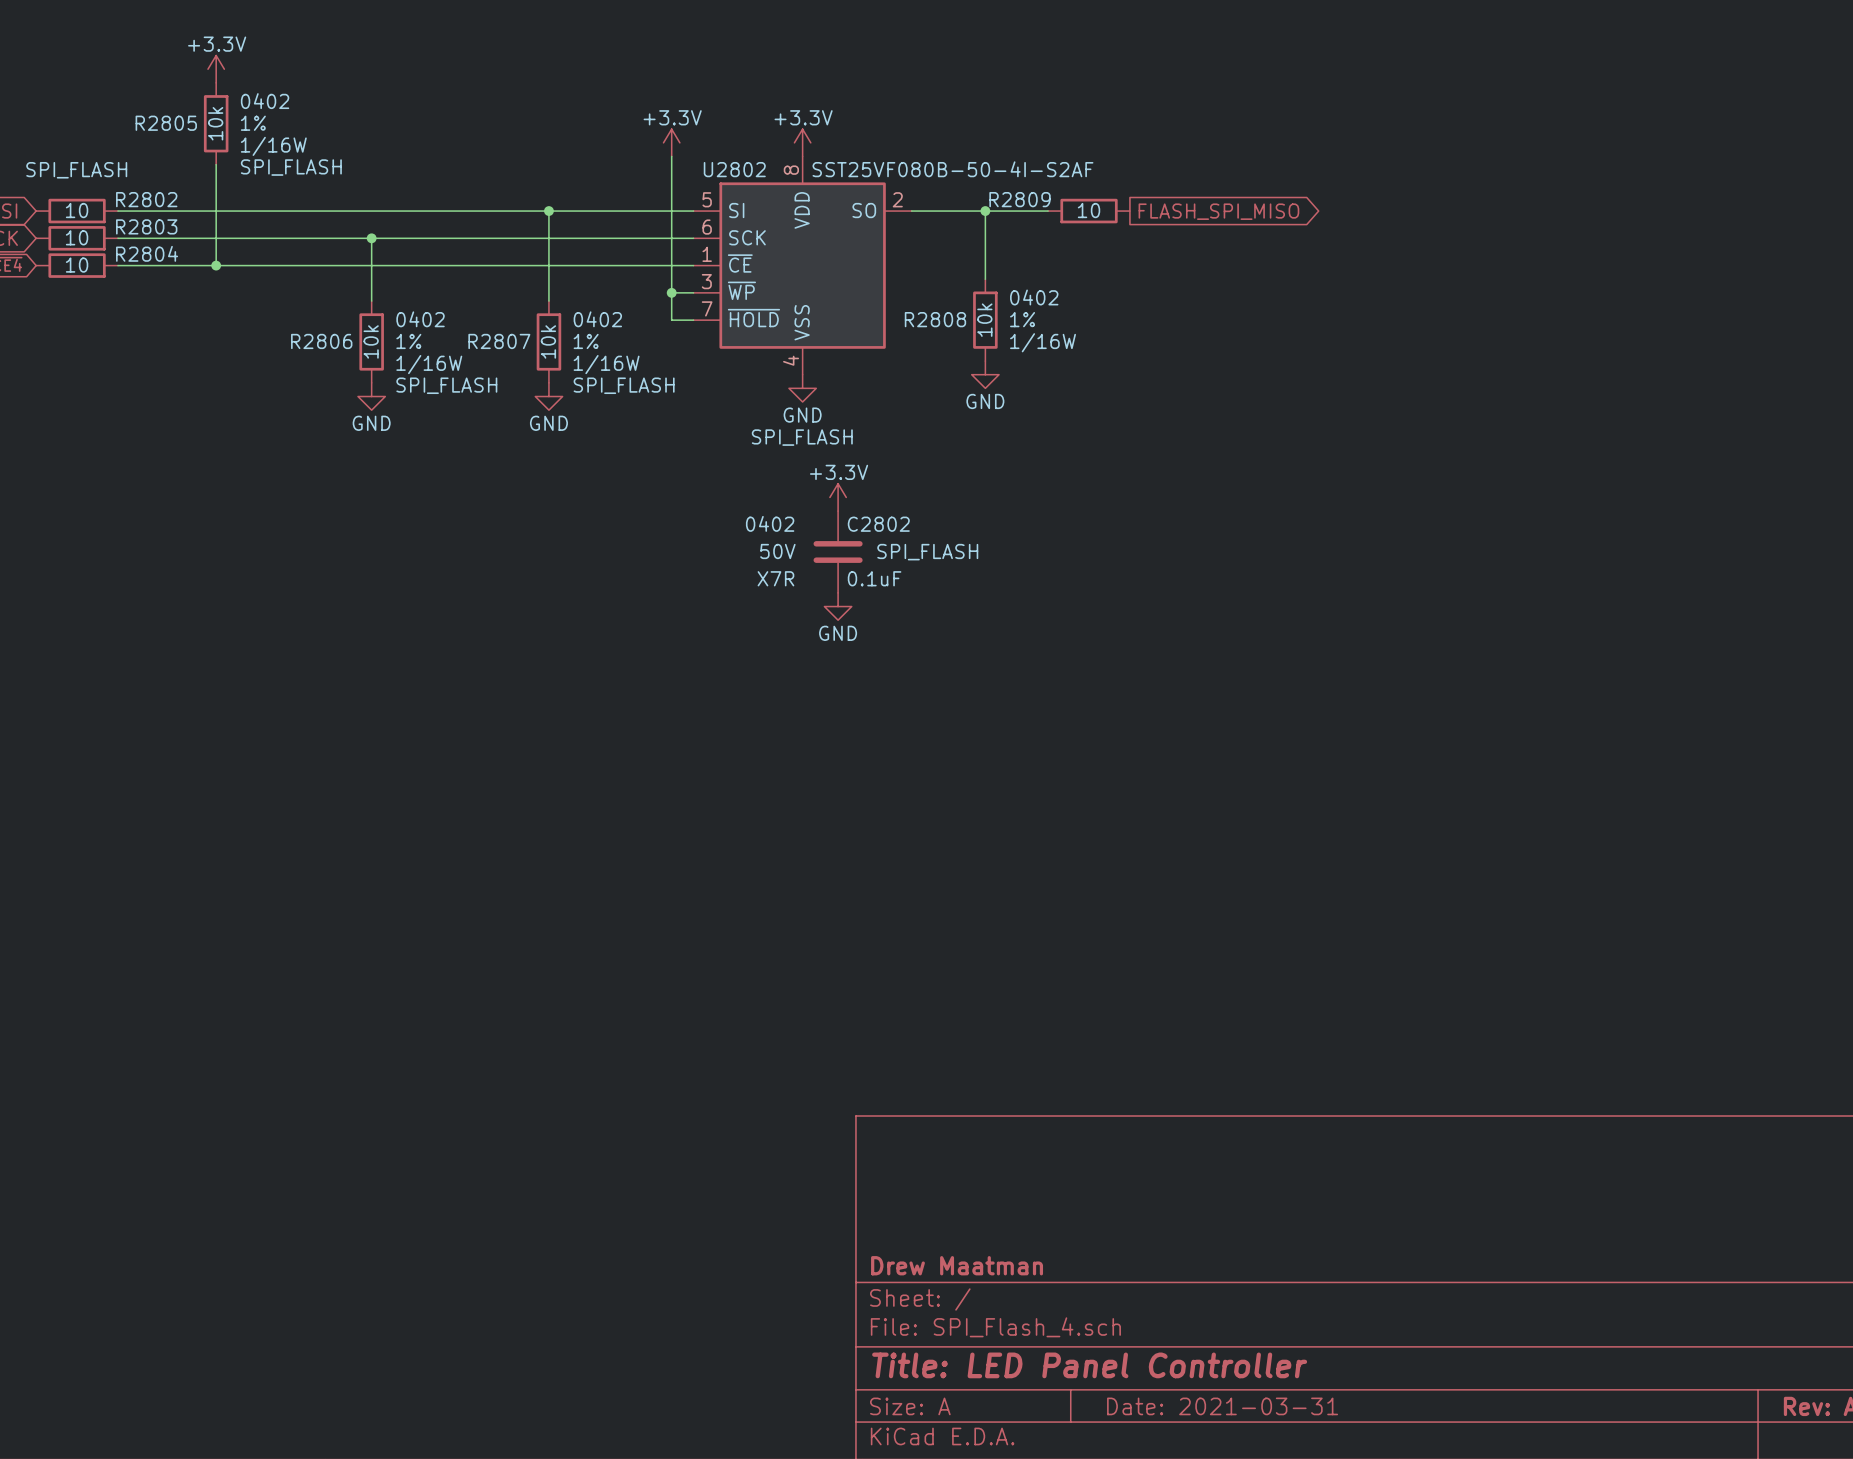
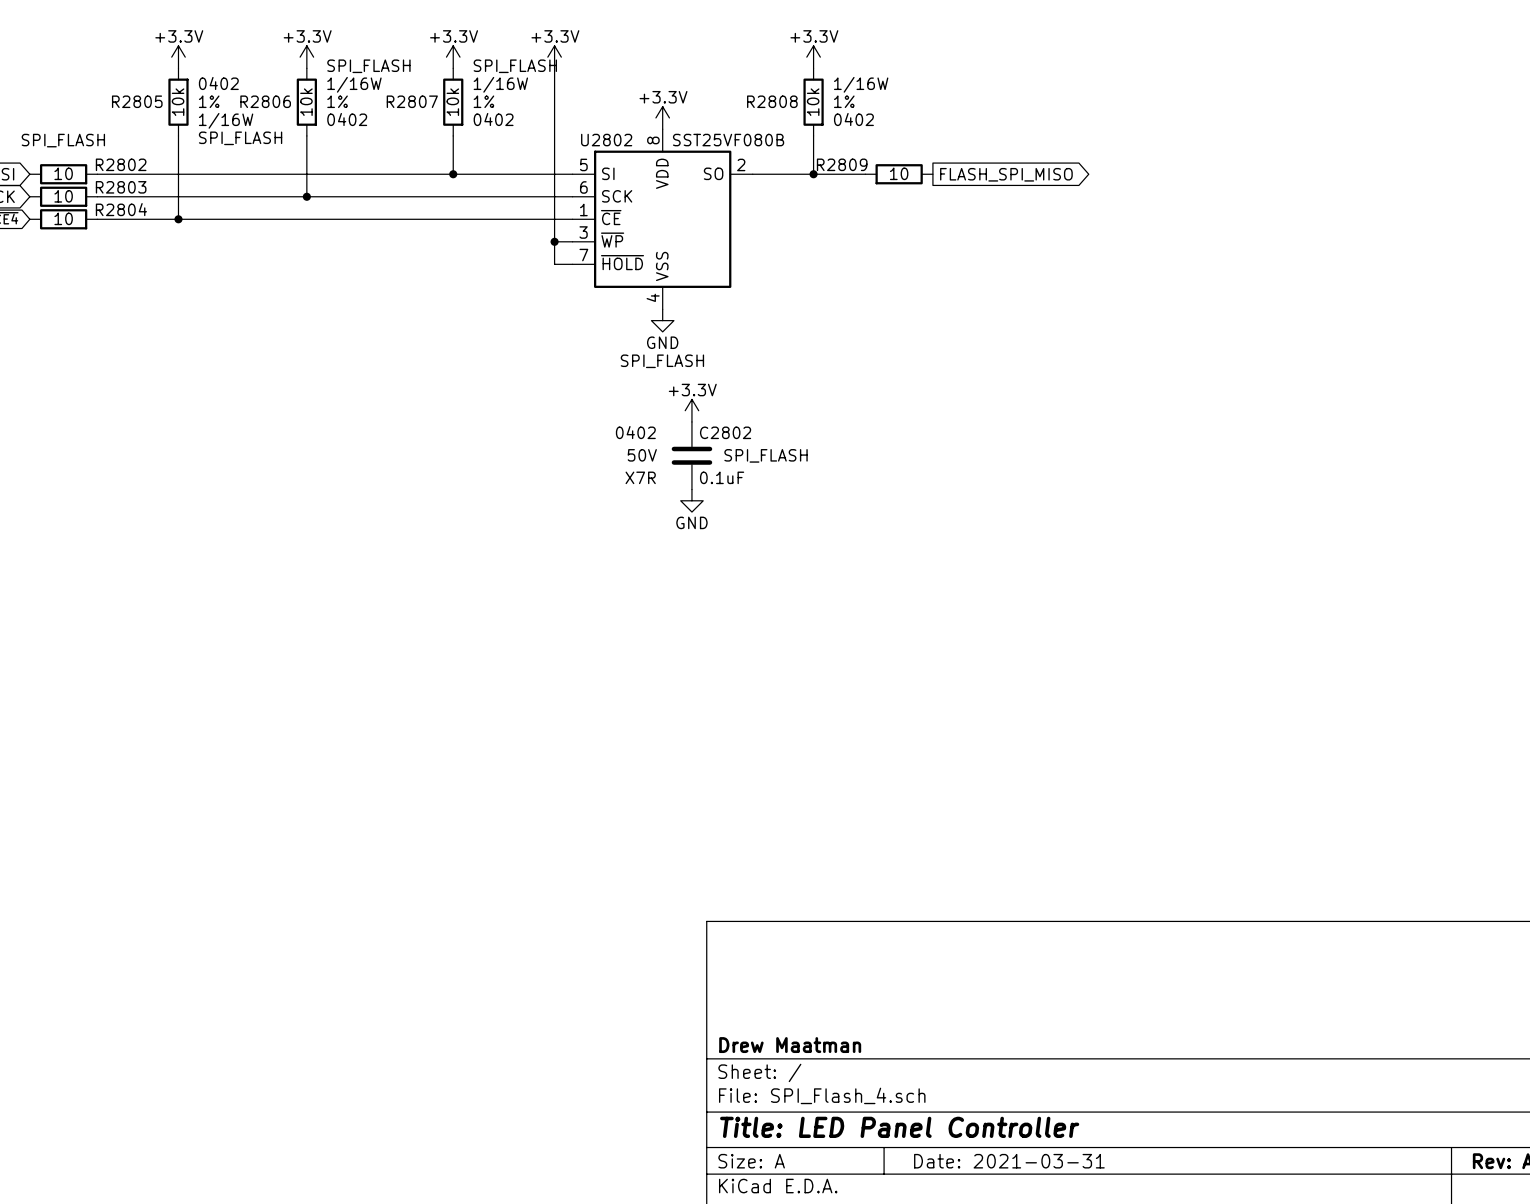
power symbol: none -> +3.3V (306, 57)
power symbol: none -> +3.3V (453, 57)
power symbol: none -> +3.3V (554, 57)
power symbol: none -> +3.3V (813, 57)
wire: none -> (554, 68) (554, 129)
power symbol: +3.3V (671, 142) -> none
U2802 value: SST25VF080B-50-4I-S2AF (952, 169) -> SST25VF080B (728, 140)
wire: (548, 211) (548, 301) -> (453, 174) (453, 135)
wire: (985, 211) (985, 279) -> (813, 174) (813, 135)
wire: (371, 238) (371, 301) -> (306, 196) (306, 135)
R2808 text position: 0402 (1034, 297) -> 0402 (853, 119)
R2806 text position: 0402 (420, 319) -> 0402 (347, 119)
R2807 text position: 0402 (597, 319) -> 0402 (493, 119)
R2808 position: (985, 320) -> (813, 102)
R2806 position: (371, 341) -> (306, 102)
R2807 position: (548, 341) -> (453, 102)
R2808 text position: 1/16W (1043, 342) -> 1/16W (861, 84)
R2806 text position: 1/16W (429, 364) -> 1/16W (354, 84)
R2807 text position: 1/16W (606, 364) -> 1/16W (500, 84)
power symbol: GND (985, 374) -> none
R2806 text position: SPI_FLASH (446, 385) -> SPI_FLASH (368, 66)
R2807 text position: SPI_FLASH (624, 385) -> SPI_FLASH (515, 66)
power symbol: GND (371, 396) -> none
power symbol: GND (548, 396) -> none

